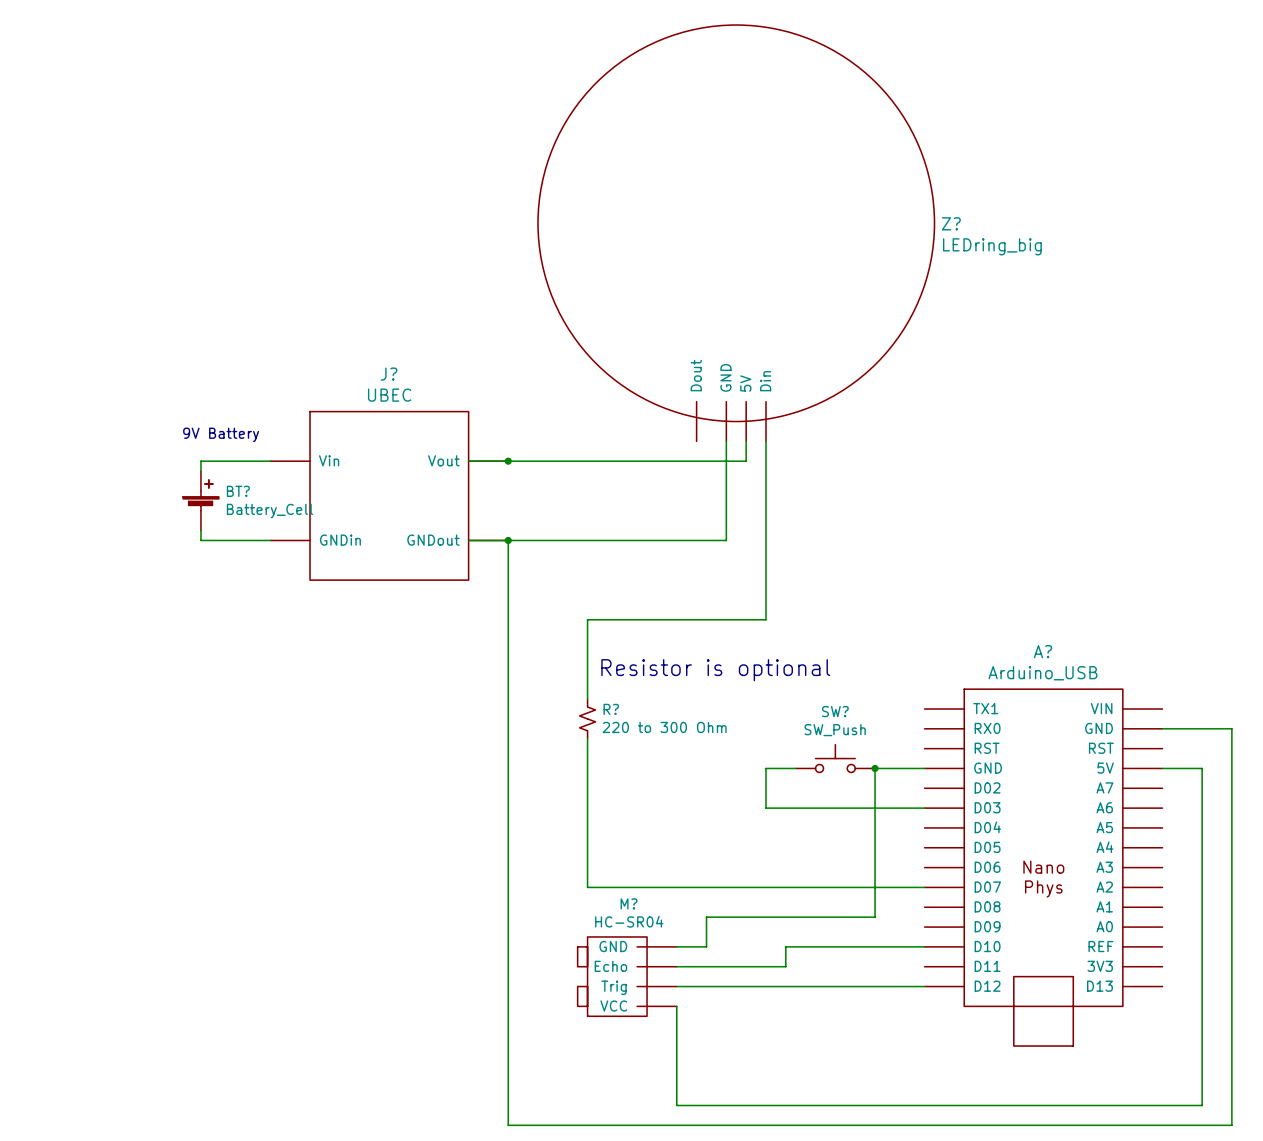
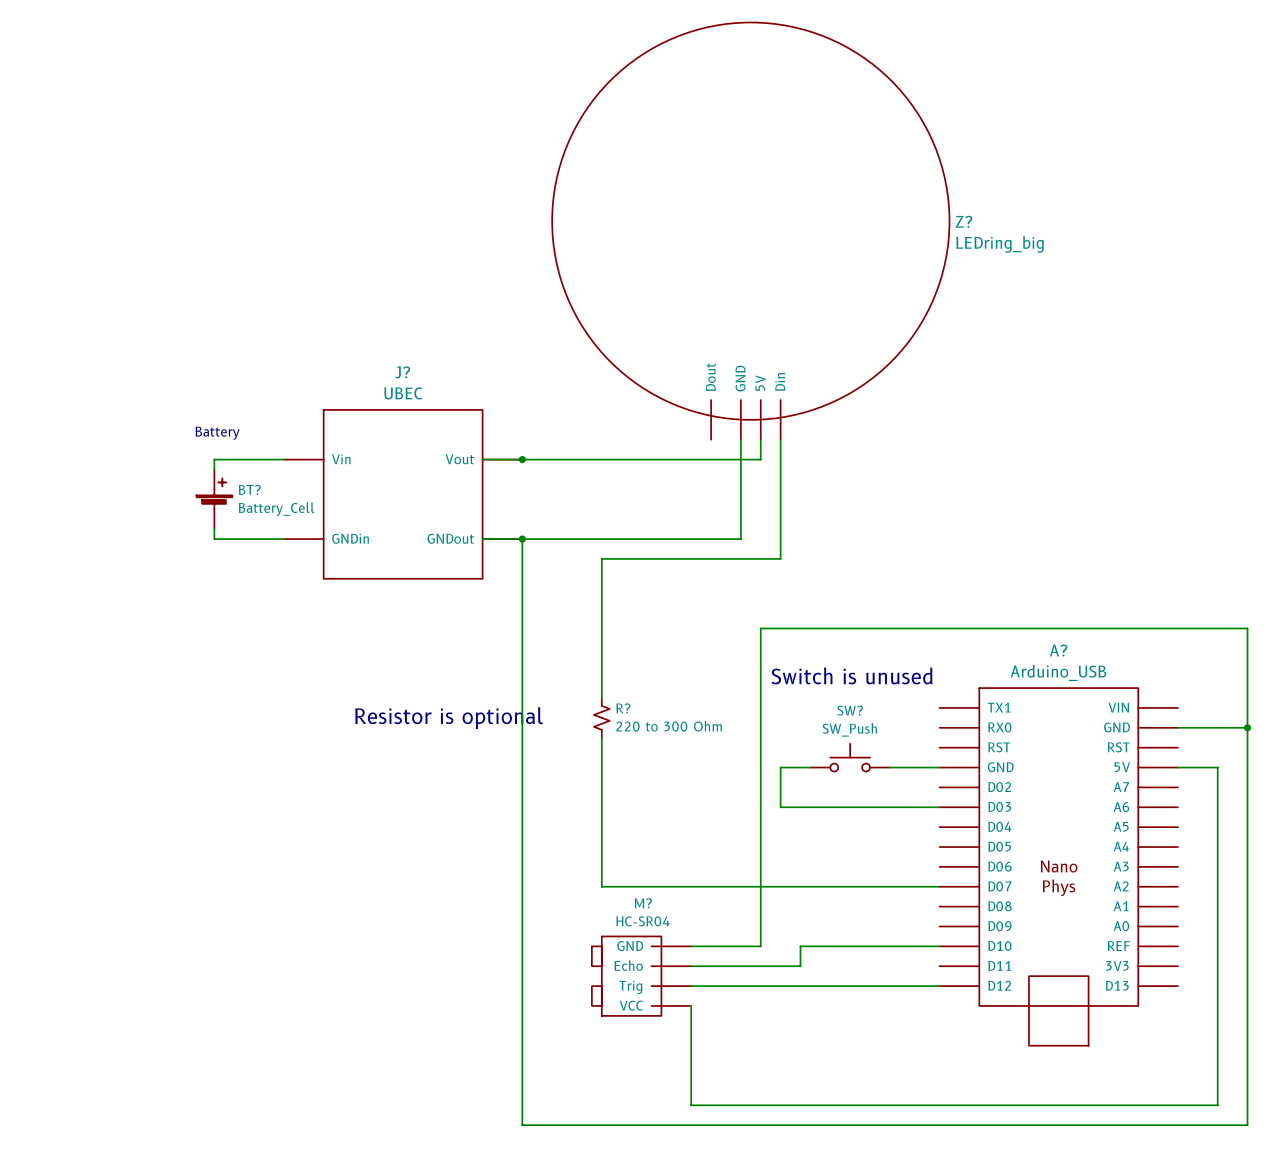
text: 9V Battery (221, 434) -> Battery (217, 433)
wire: (765, 560) (765, 619) (587, 619) -> (780, 558) (601, 558) (601, 618)
text: Resistor is optional (715, 670) -> none
text: none -> Switch is unused (852, 675)
text: none -> Resistor is optional (449, 718)
junction: none -> (1247, 727)
wire: (875, 768) (875, 917) (706, 917) (706, 946) -> (1247, 727) (1247, 628) (760, 628) (760, 946) (721, 946)
junction: (875, 768) -> none

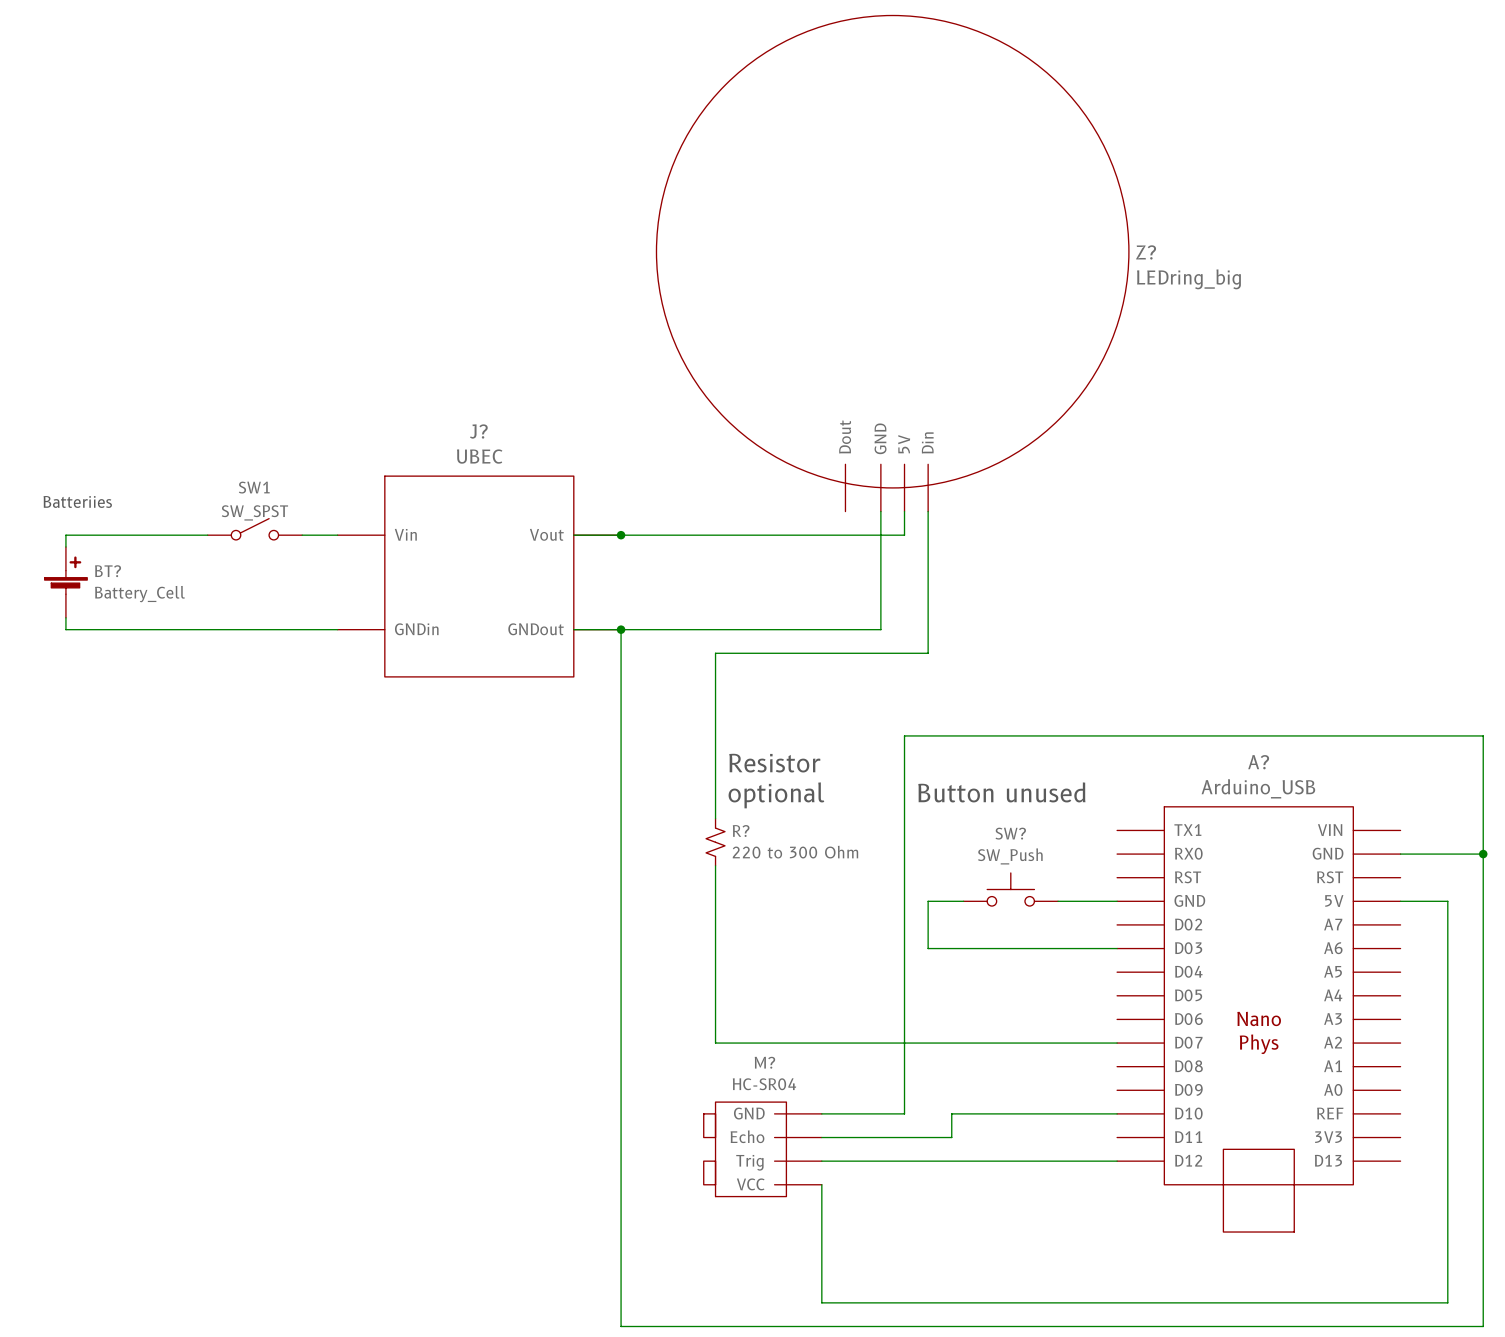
text: none -> Batteriies (77, 501)
text: Battery (217, 433) -> none
SW1: none -> SW_SPST (254, 529)
wire: none -> (207, 535) (65, 535) (65, 546)
wire: (254, 459) (214, 459) (214, 469) -> none
BT? position: (214, 499) -> (65, 582)
wire: (214, 529) (214, 539) -> (65, 617) (65, 629) (254, 629)
text: none -> Resistor (774, 763)
text: Switch is unused (852, 675) -> Button unused (1001, 792)
text: none -> optional (776, 795)
text: Resistor is optional (449, 718) -> none

